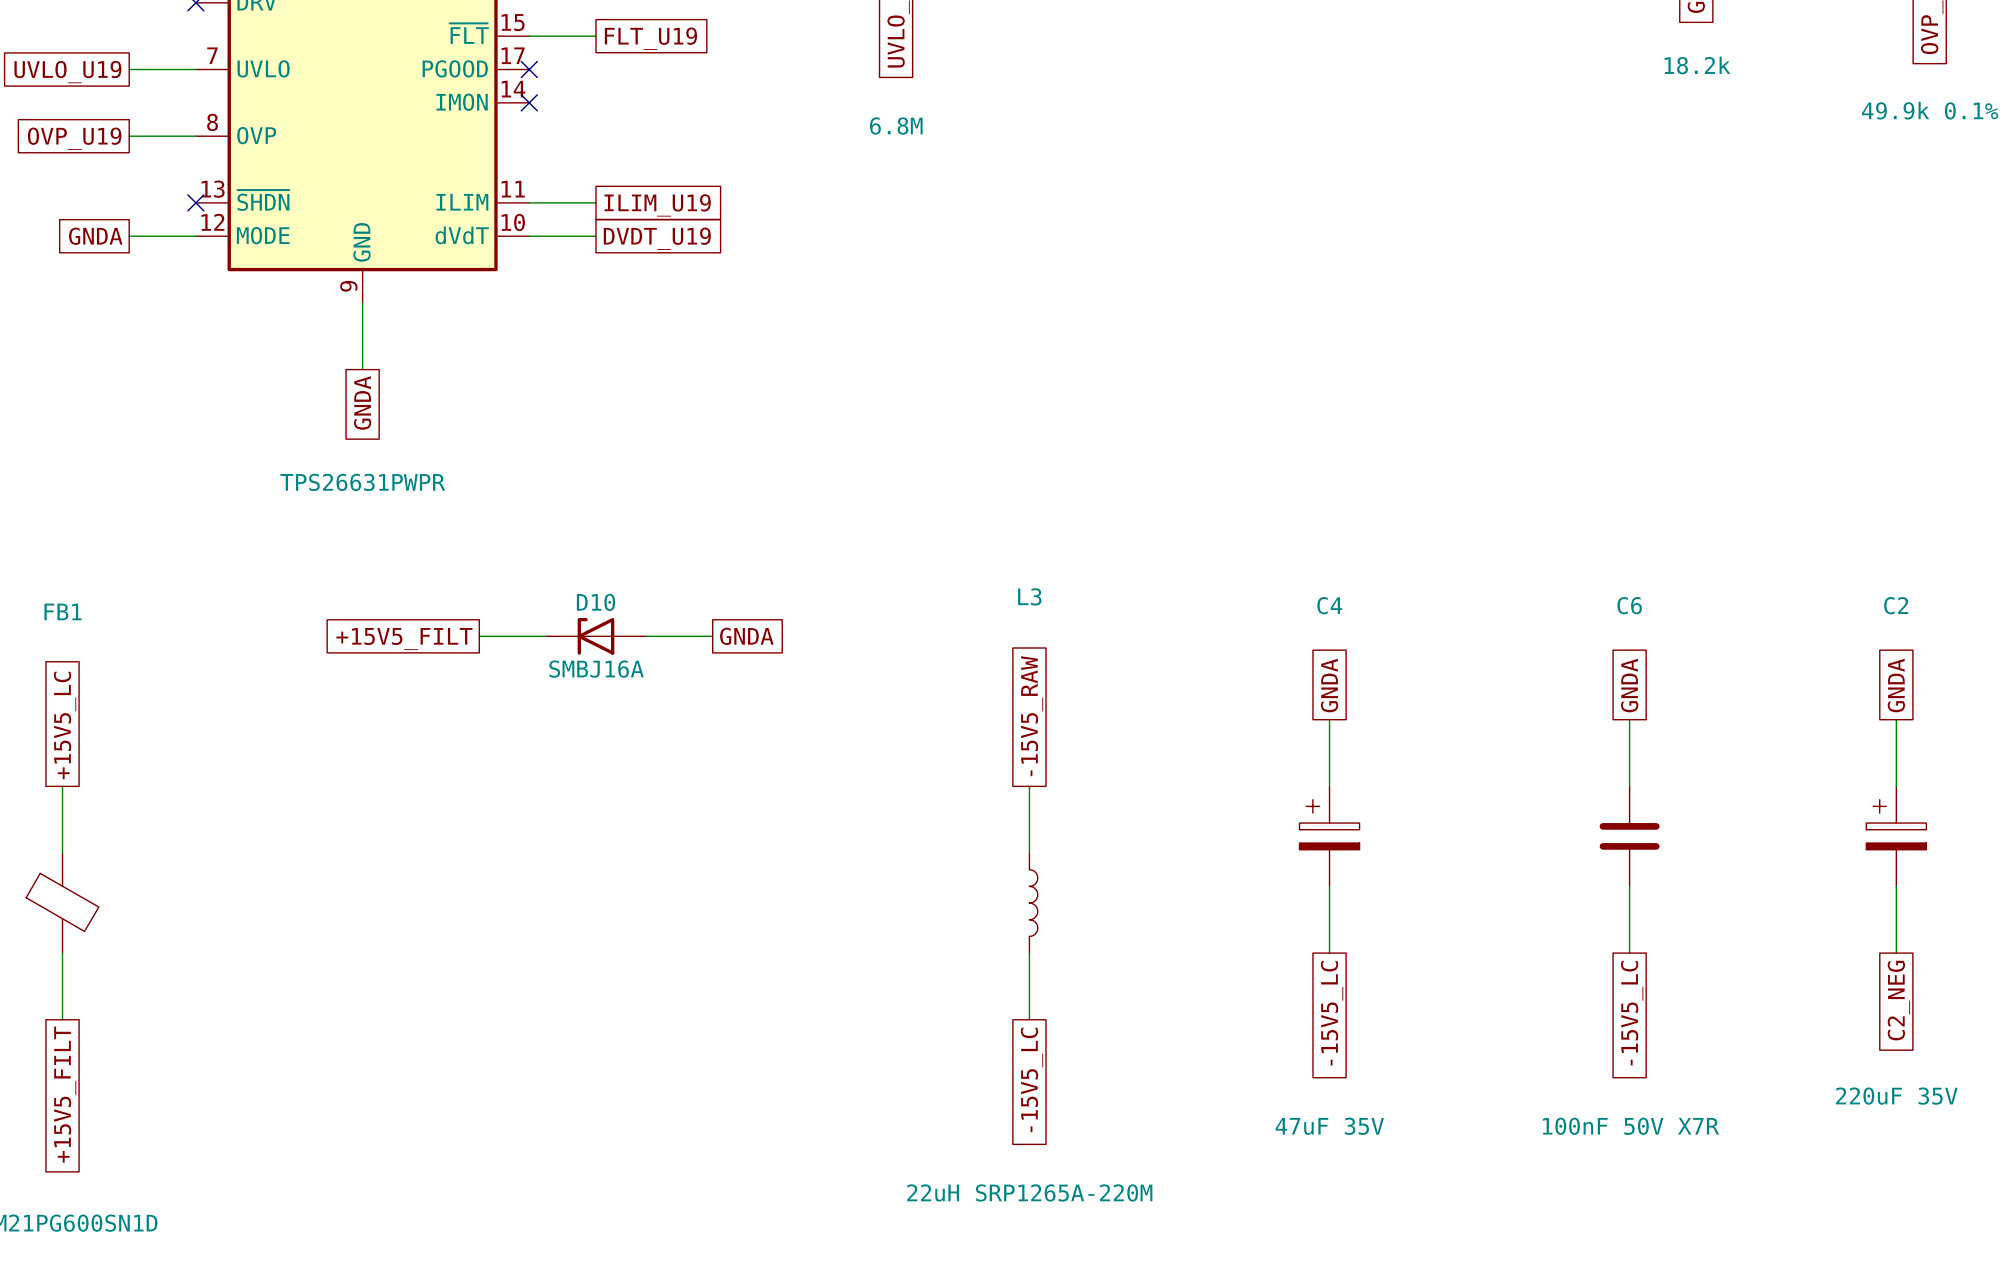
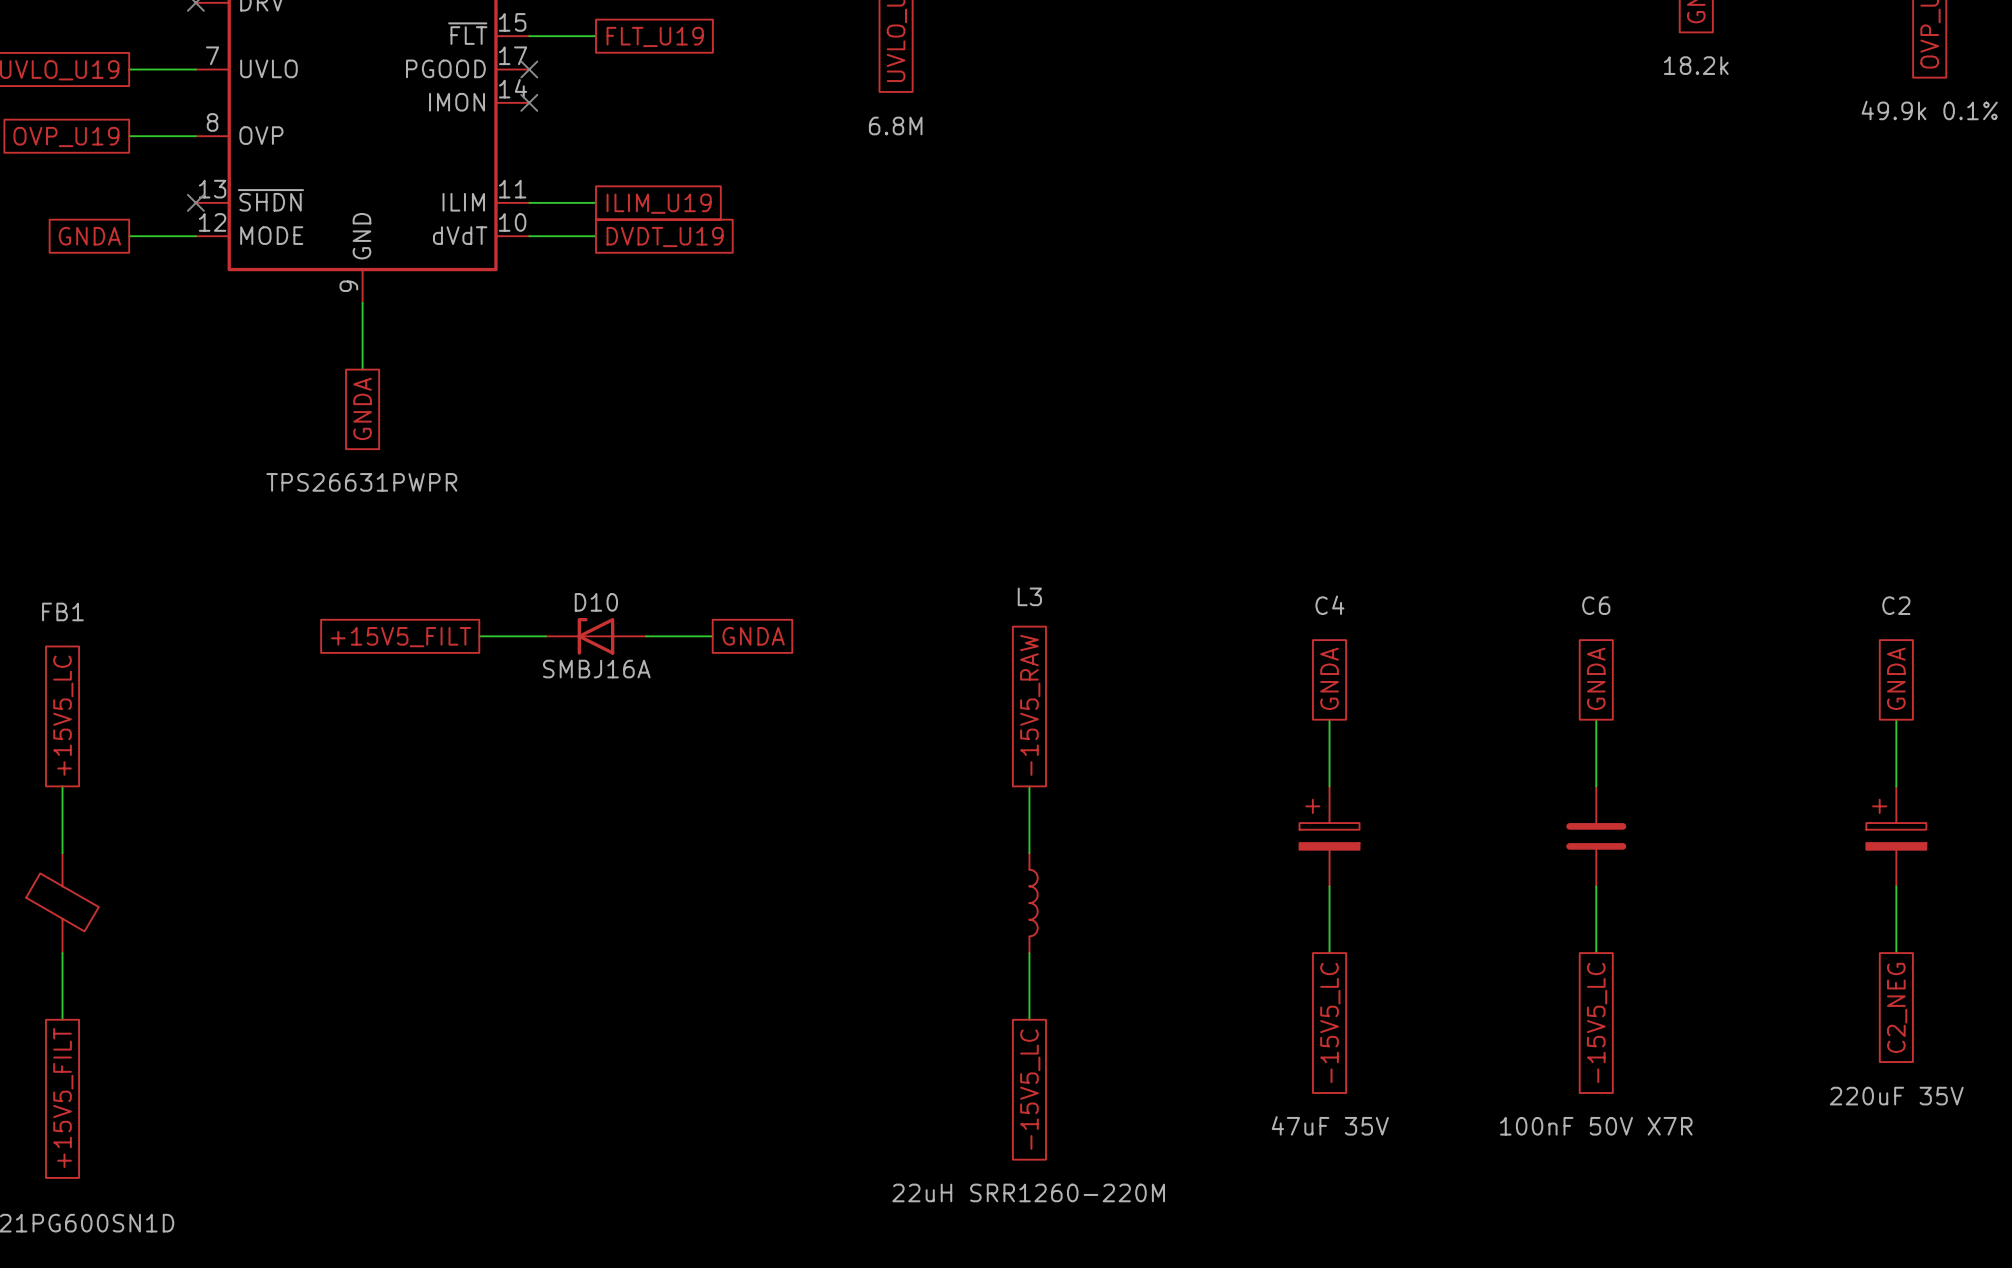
global label position: GNDA (1629, 685) -> GNDA (1596, 678)
wire: (1629, 719) (1629, 786) -> (1596, 719) (1596, 786)
C6 position: (1629, 836) -> (1596, 836)
wire: (1629, 886) (1629, 953) -> (1596, 886) (1596, 953)
global label position: -15V5_LC (1632, 1013) -> -15V5_LC (1597, 1022)
L3 value: 22uH SRP1265A-220M (1029, 1192) -> 22uH SRR1260-220M (1028, 1192)

